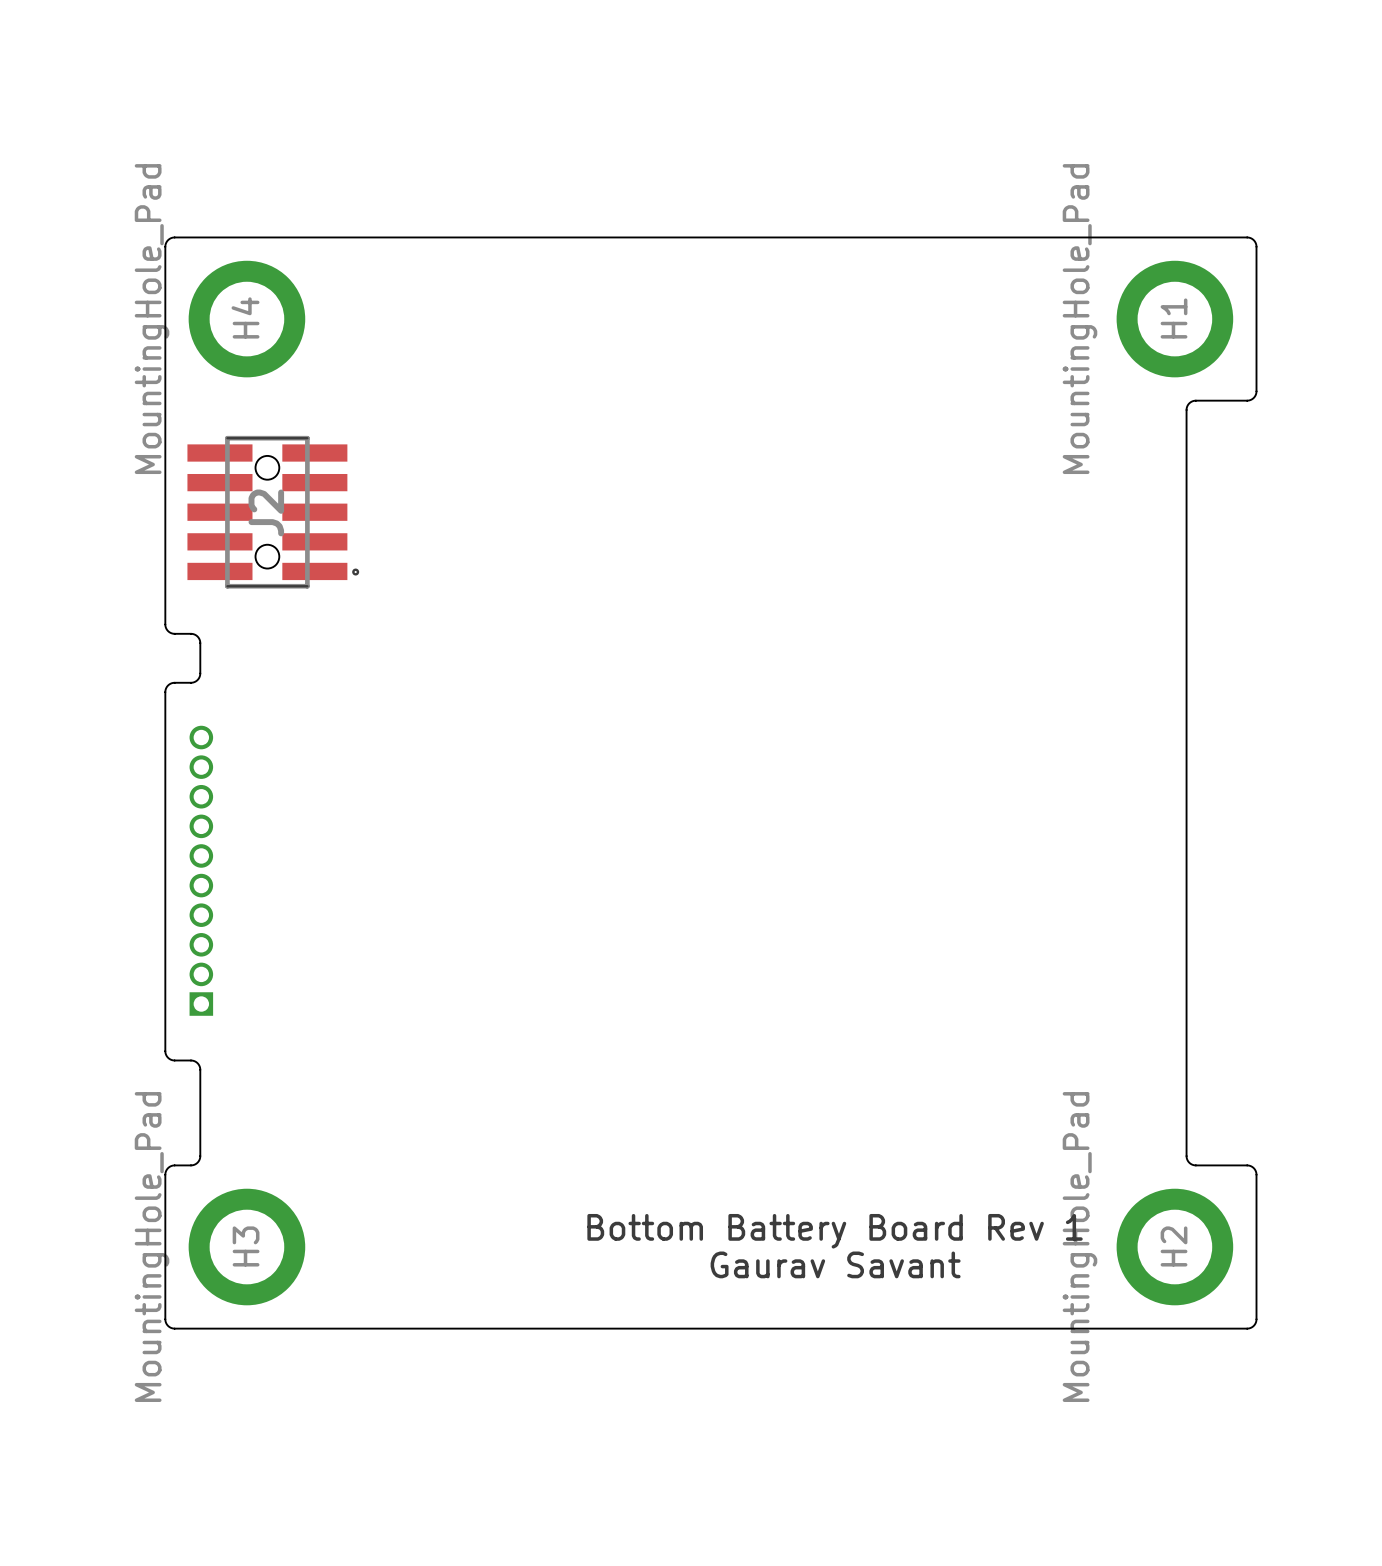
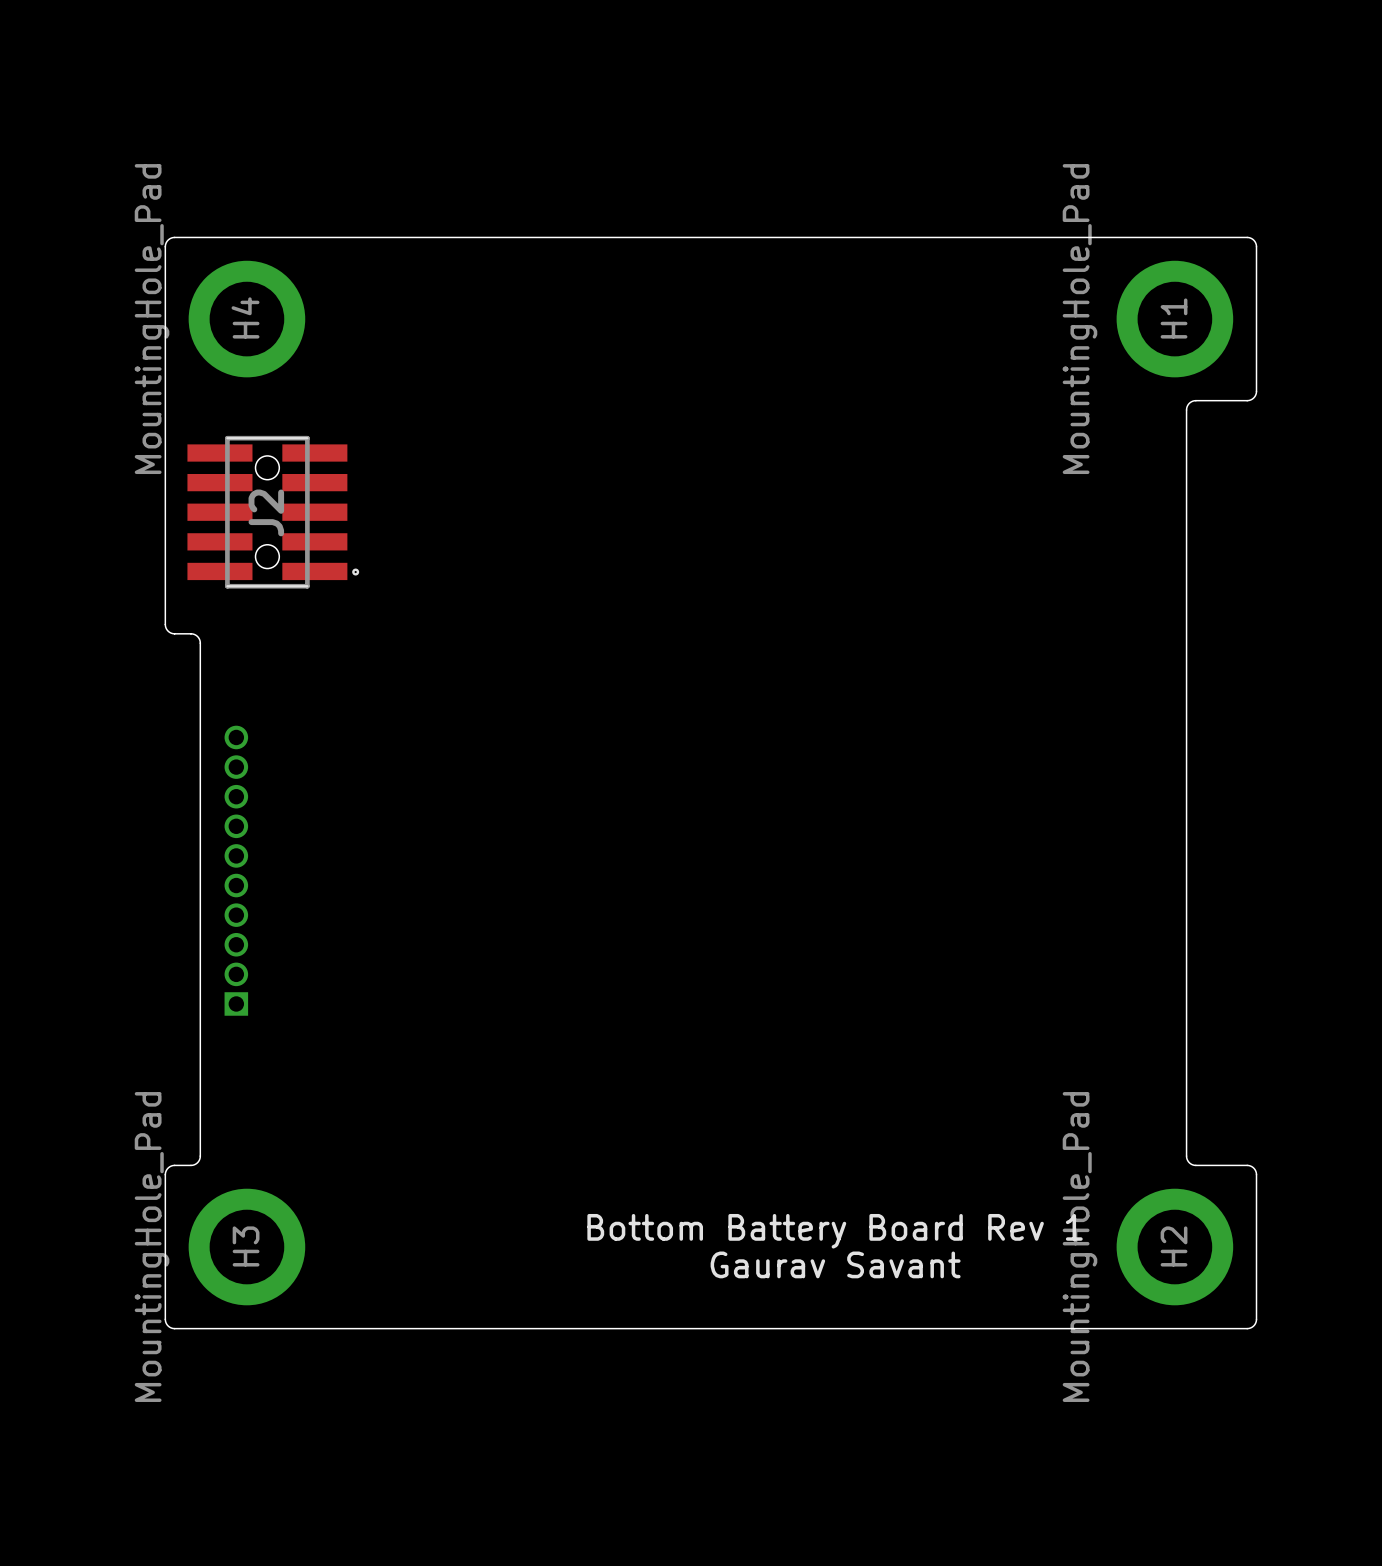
board edge: (200, 673) (199, 678) (194, 682) (170, 684) (165, 692) (165, 1052) (168, 1057) (172, 1060) (195, 1061) (200, 1069) -> (200, 673) (200, 1069)
part position: (201, 870) -> (236, 870)

